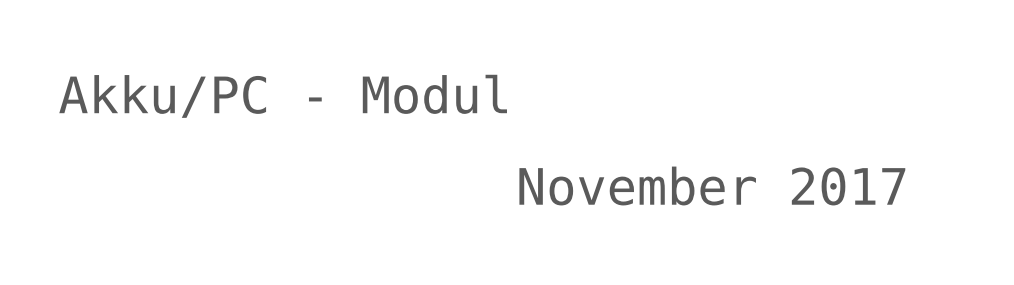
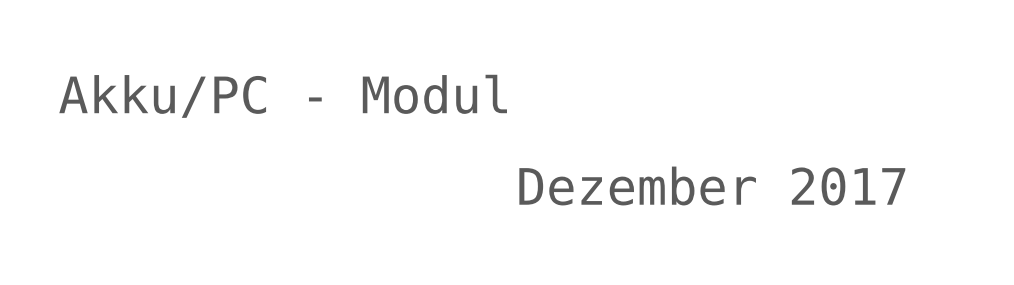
text: November 2017 (712, 186) -> Dezember 2017 (712, 186)

